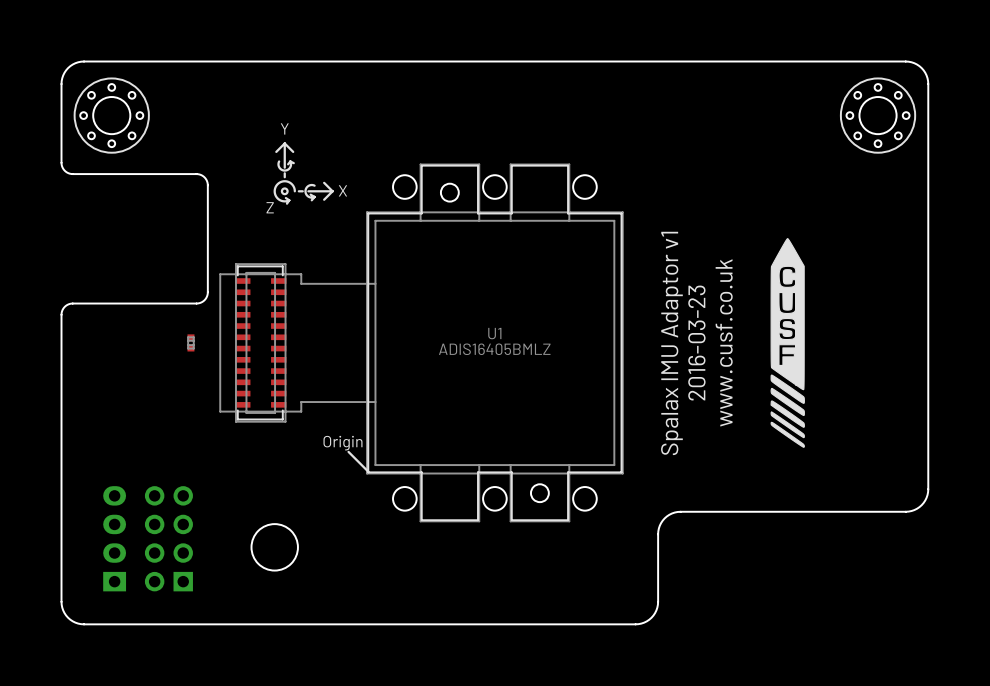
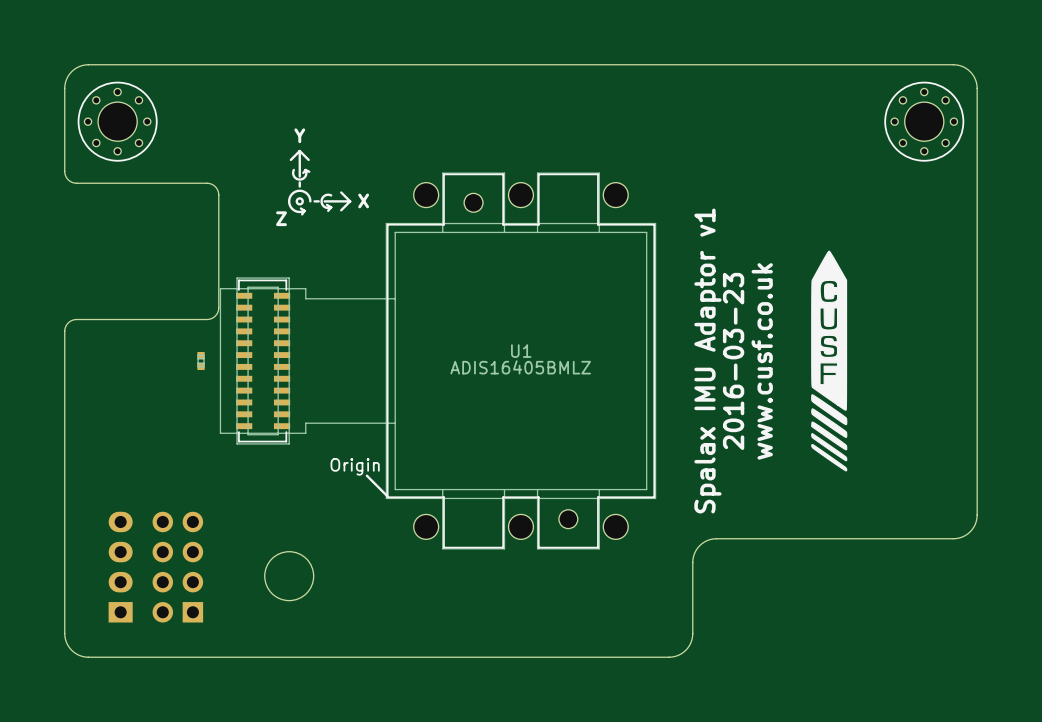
U1 footprint: [220, 164, 623, 522] -> [220, 173, 656, 549]

